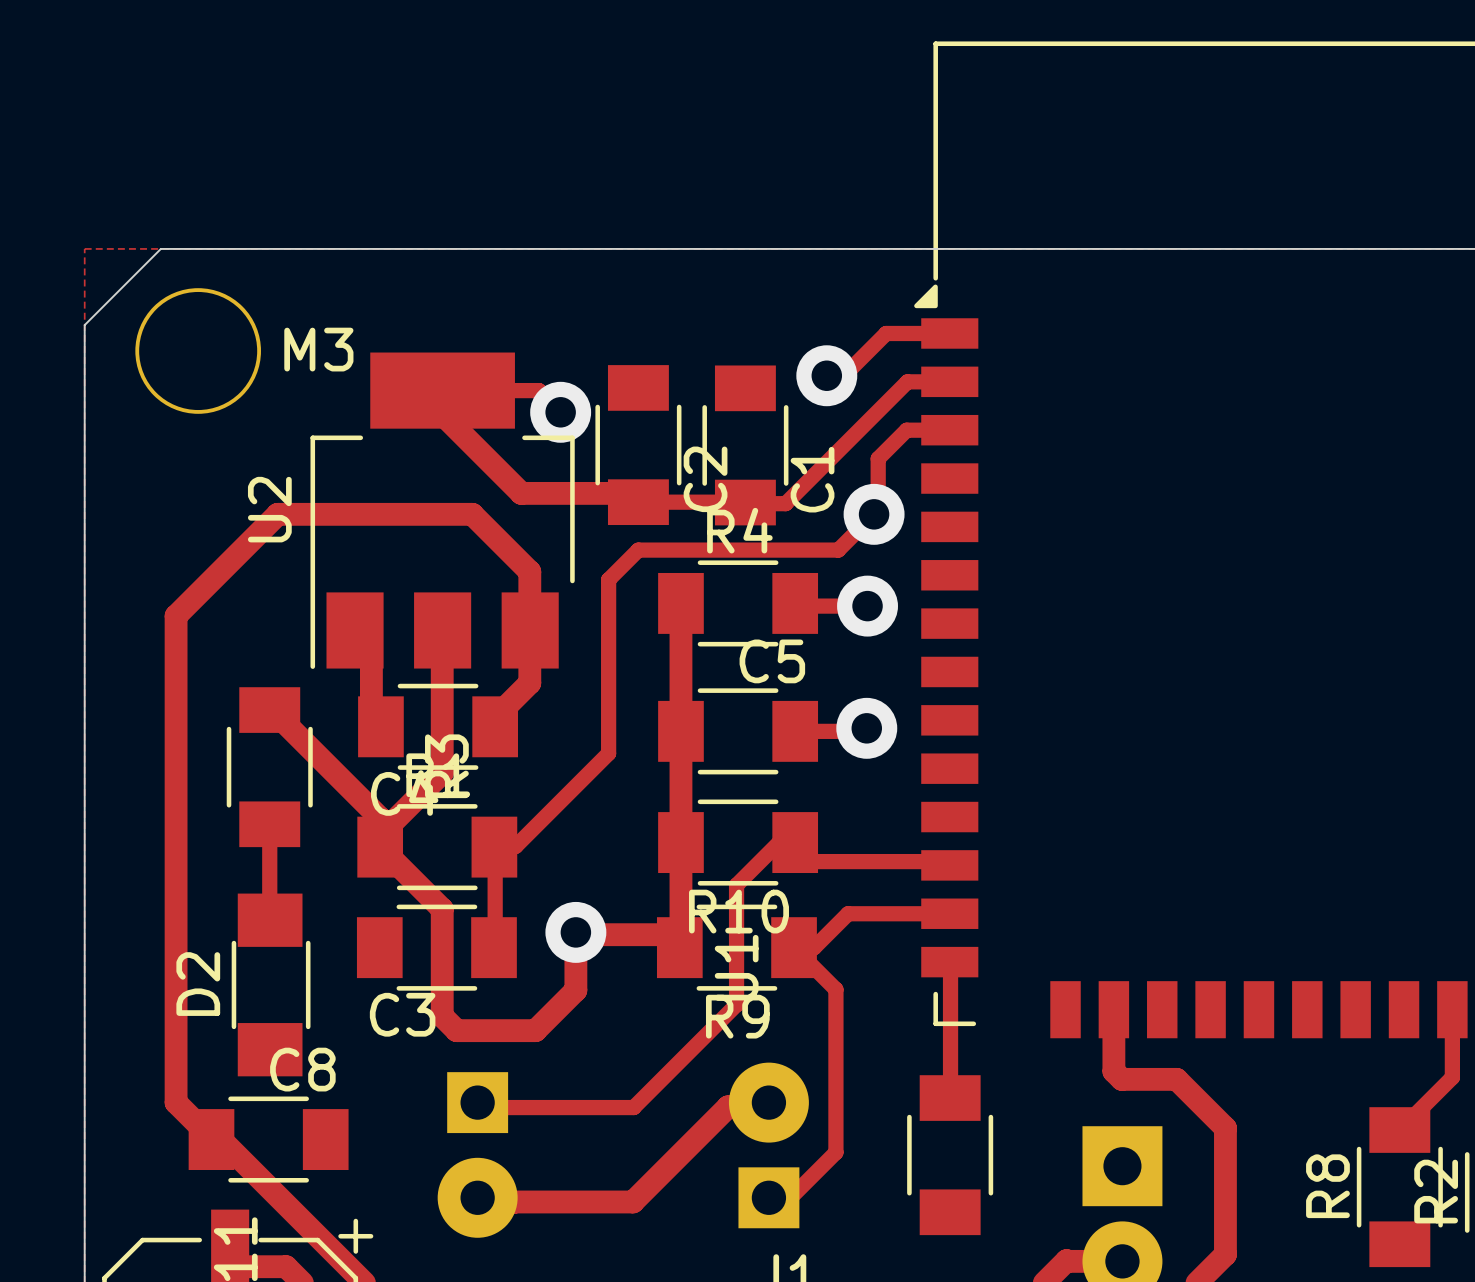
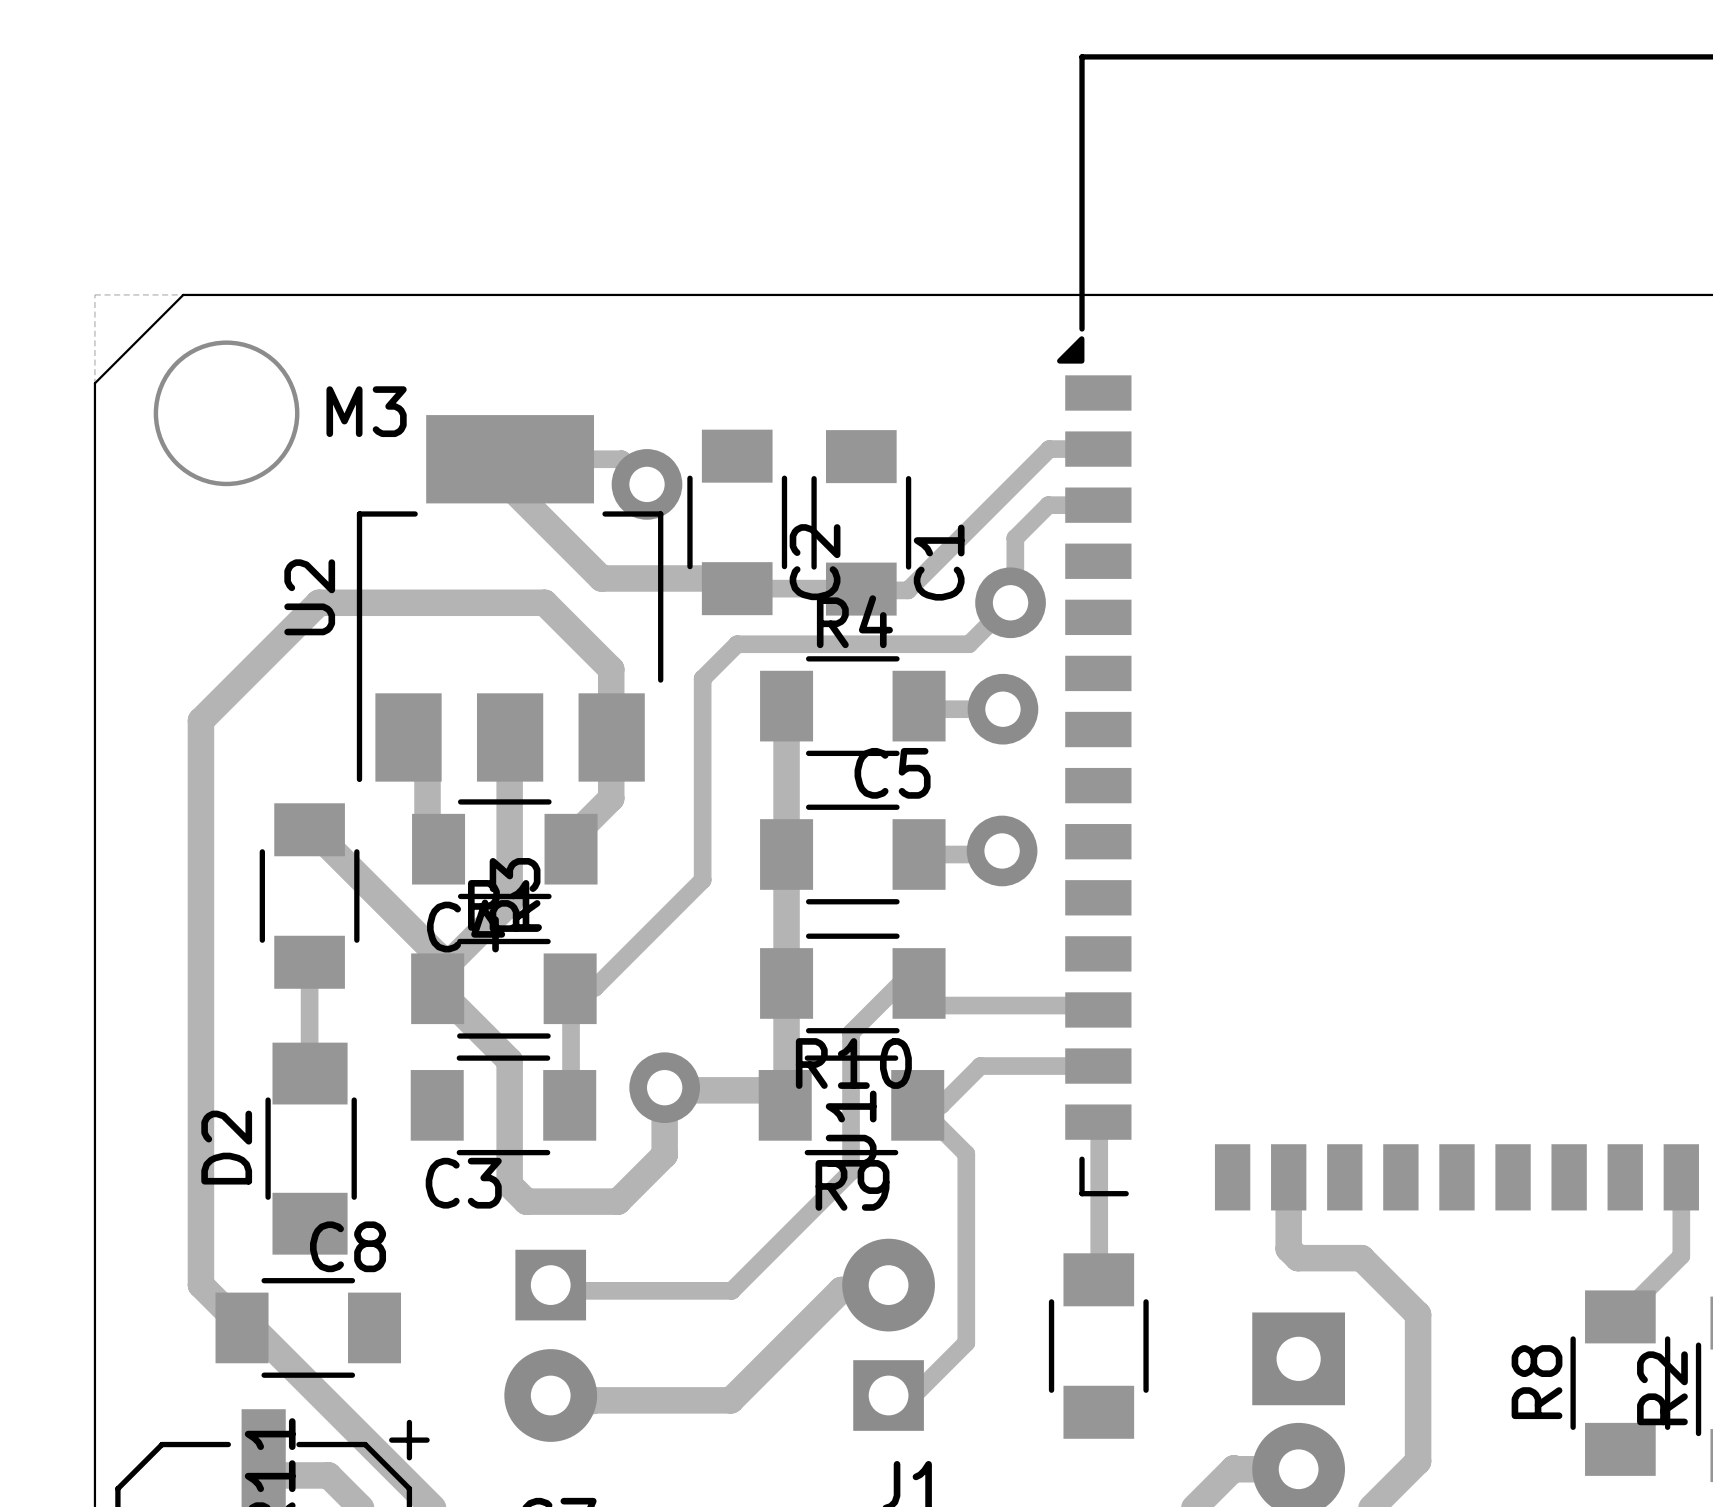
track: (949, 333) (886, 333) (843, 375) (826, 375) -> none
via: (826, 375) -> none

